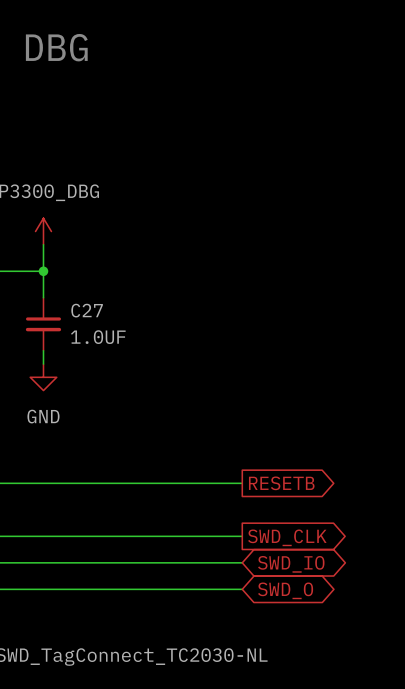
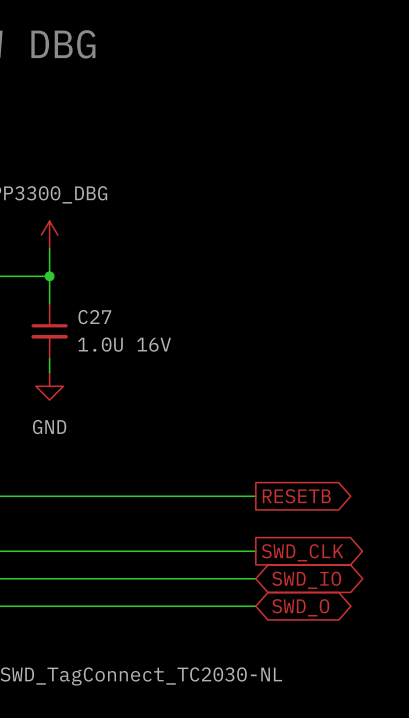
C27 value: 1.0UF (98, 337) -> 1.0U 16V (124, 344)

